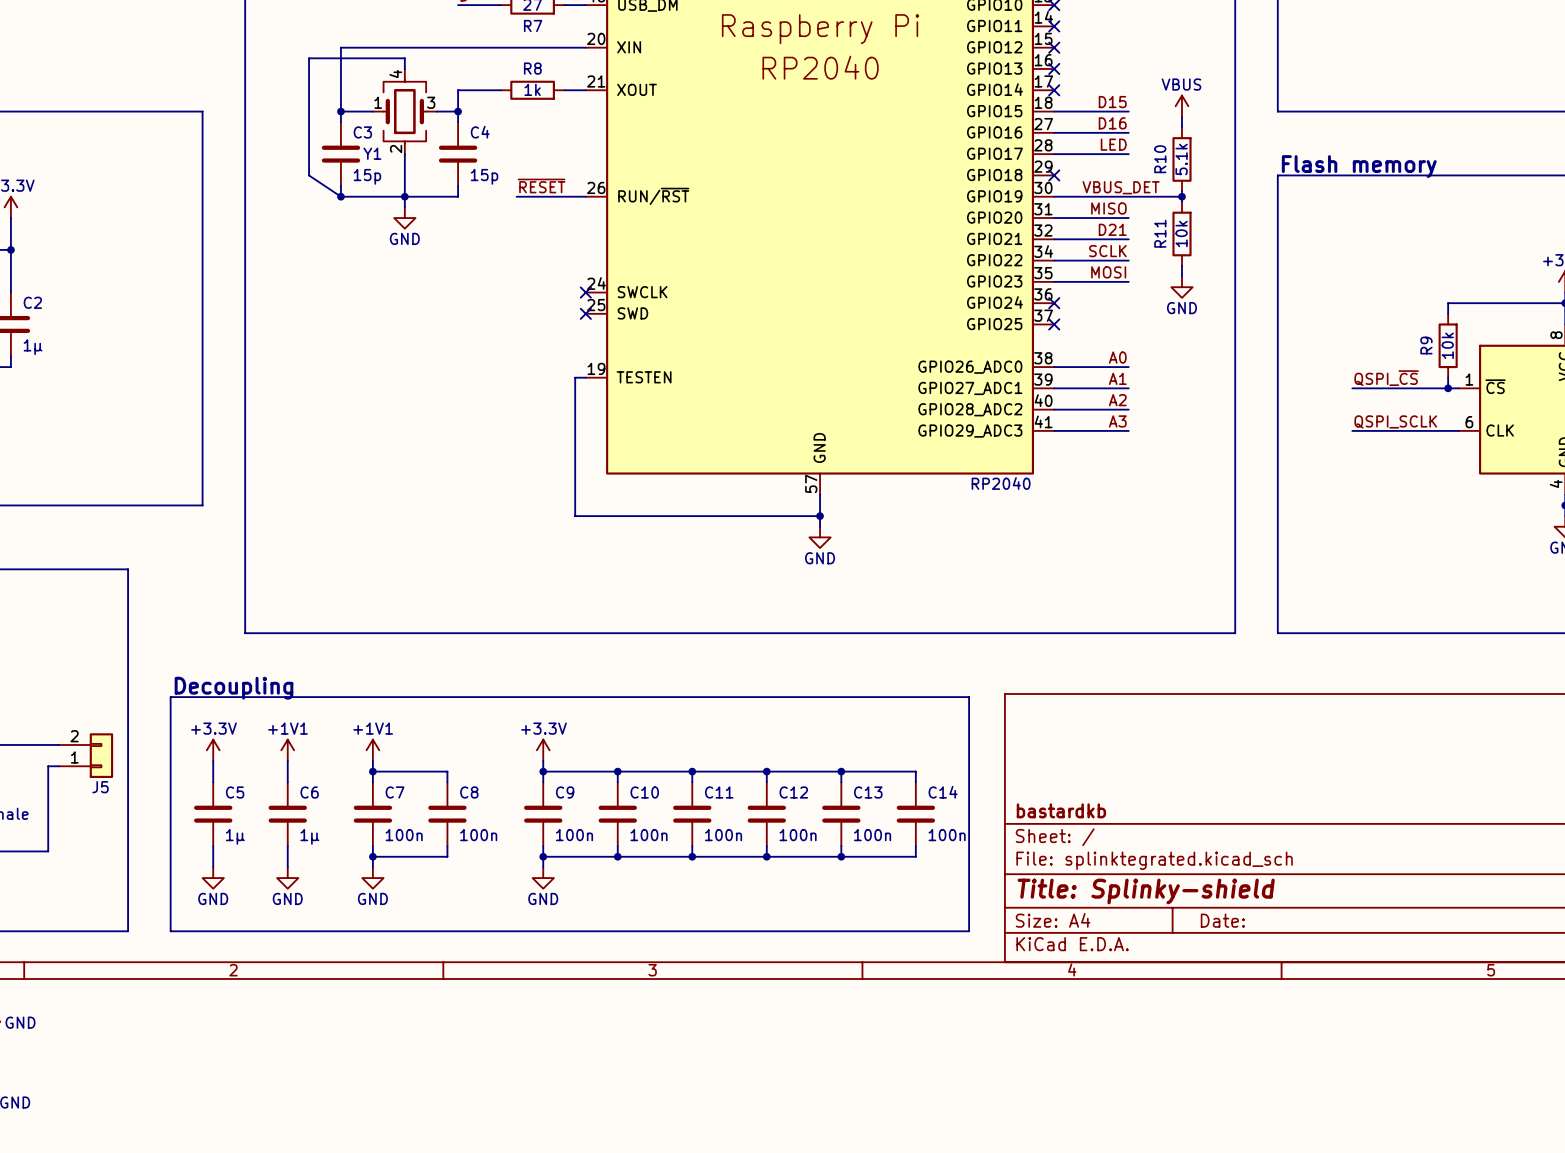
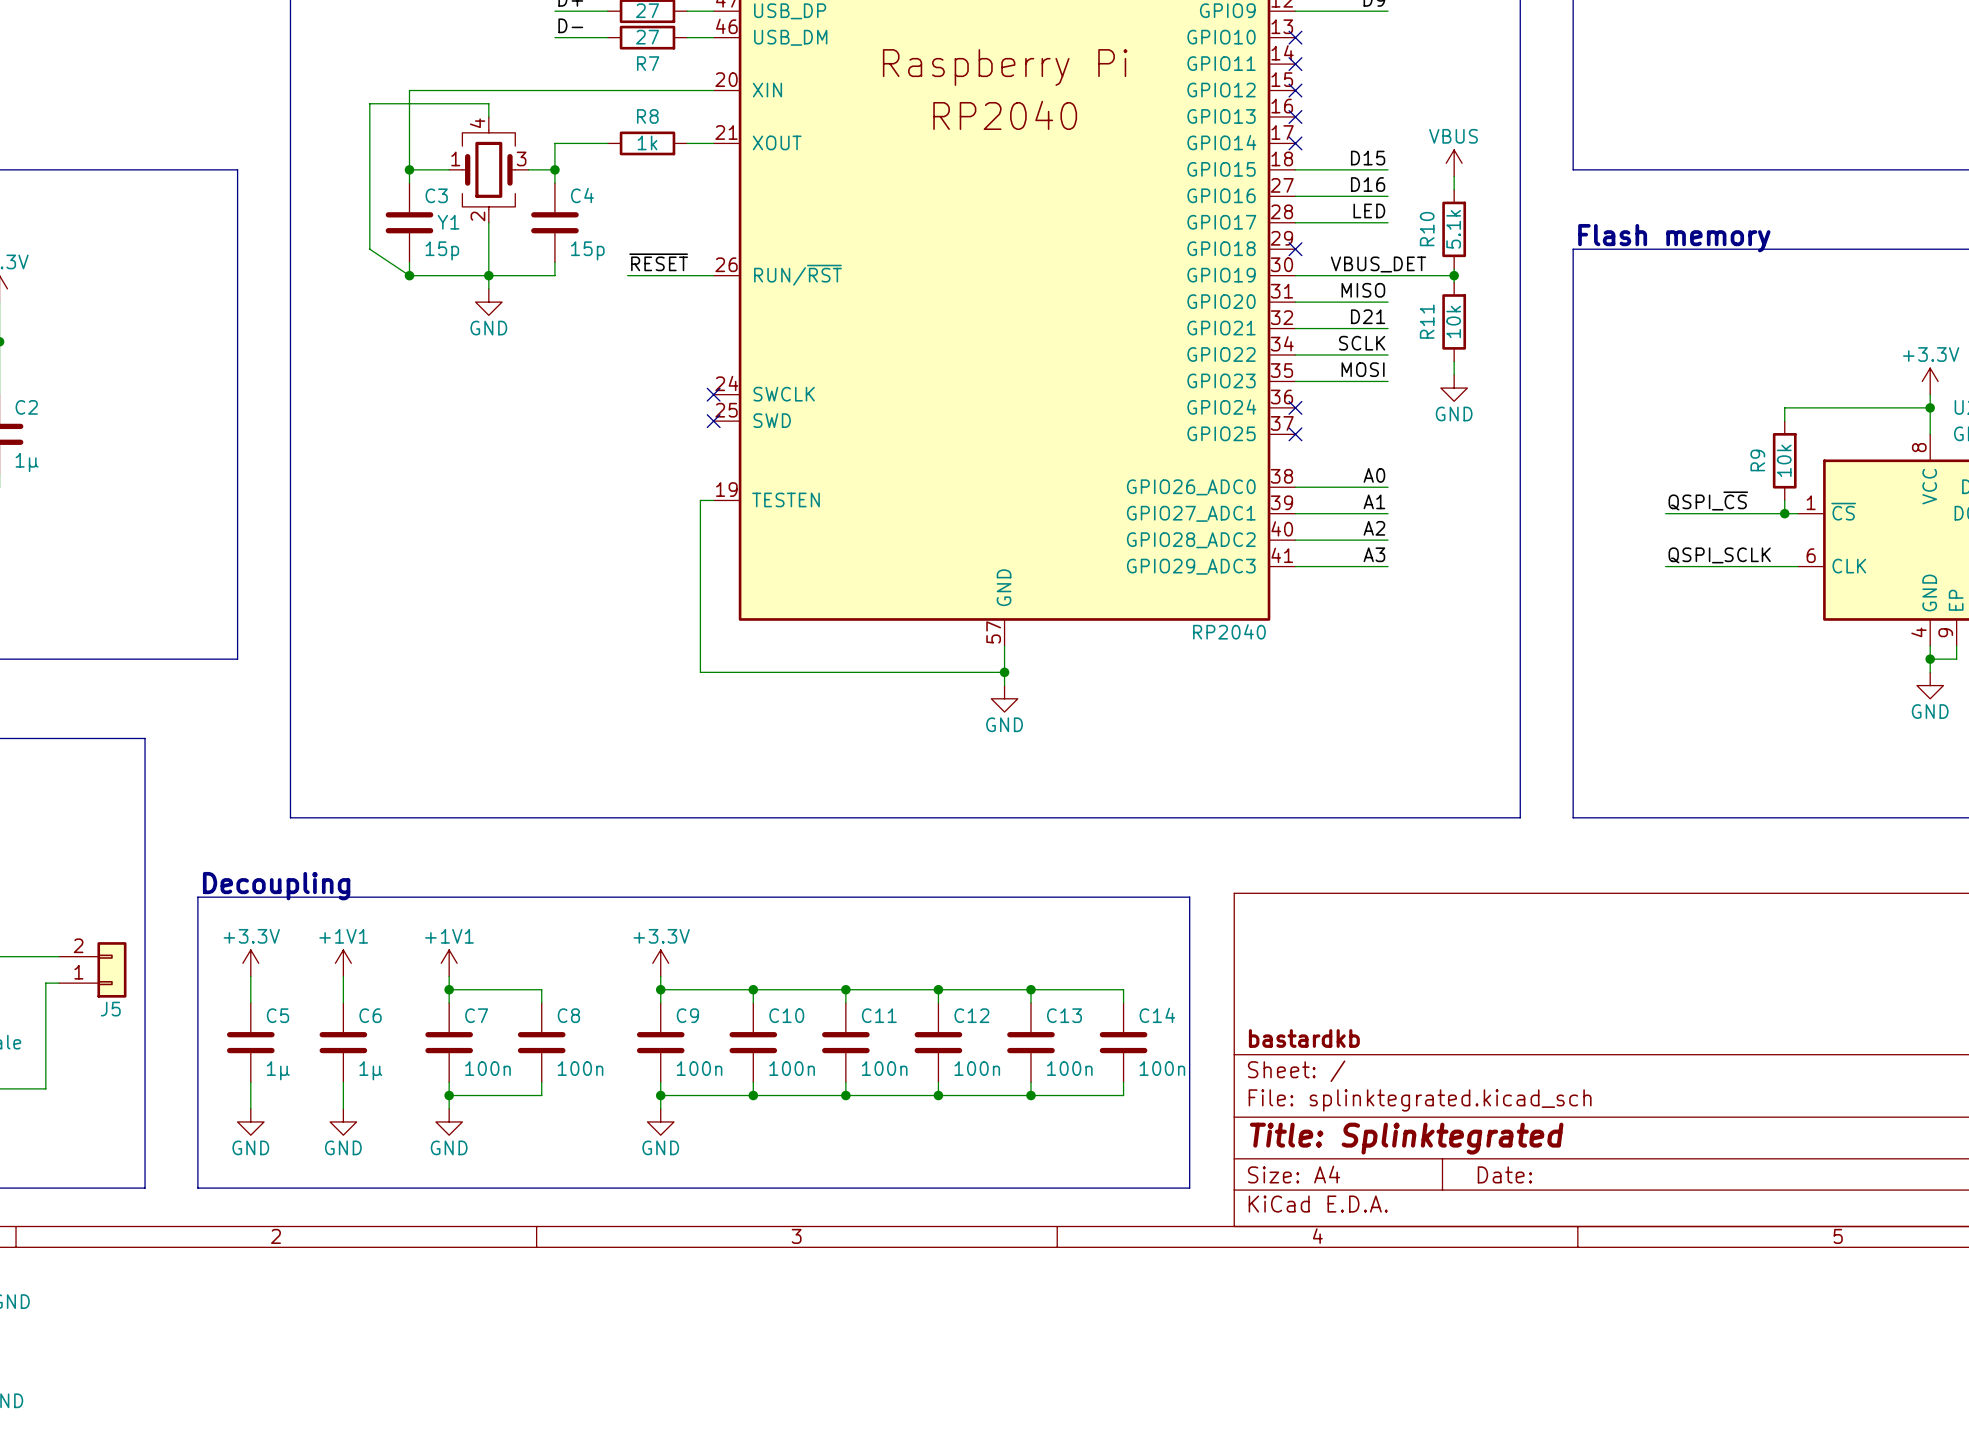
title block: Title: Splinky-shield (1146, 891) -> Title: Splinktegrated (1406, 1138)

